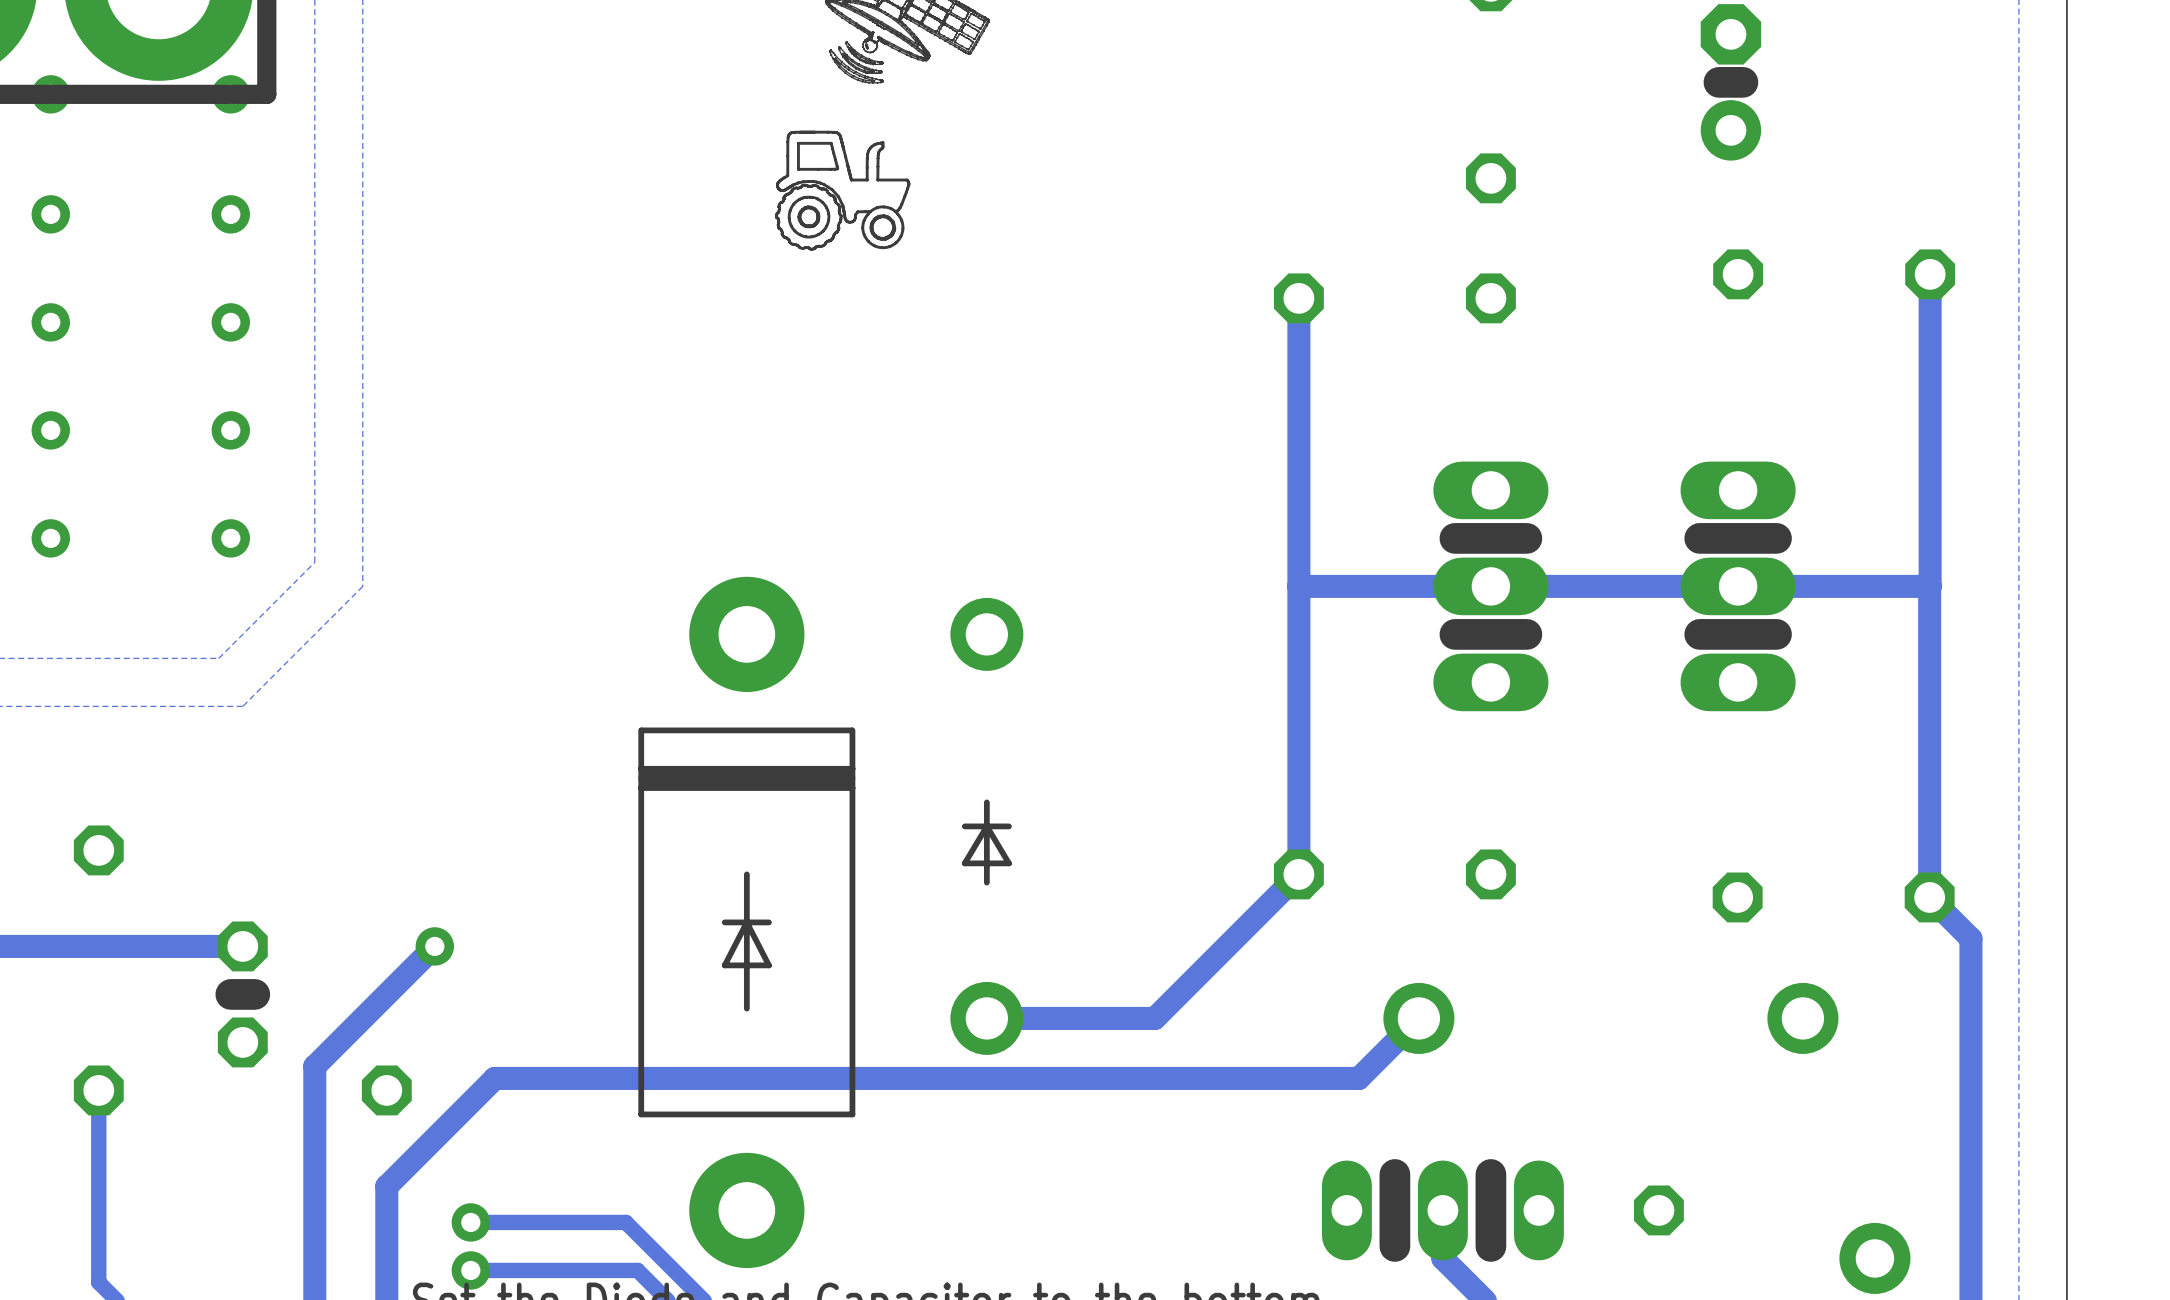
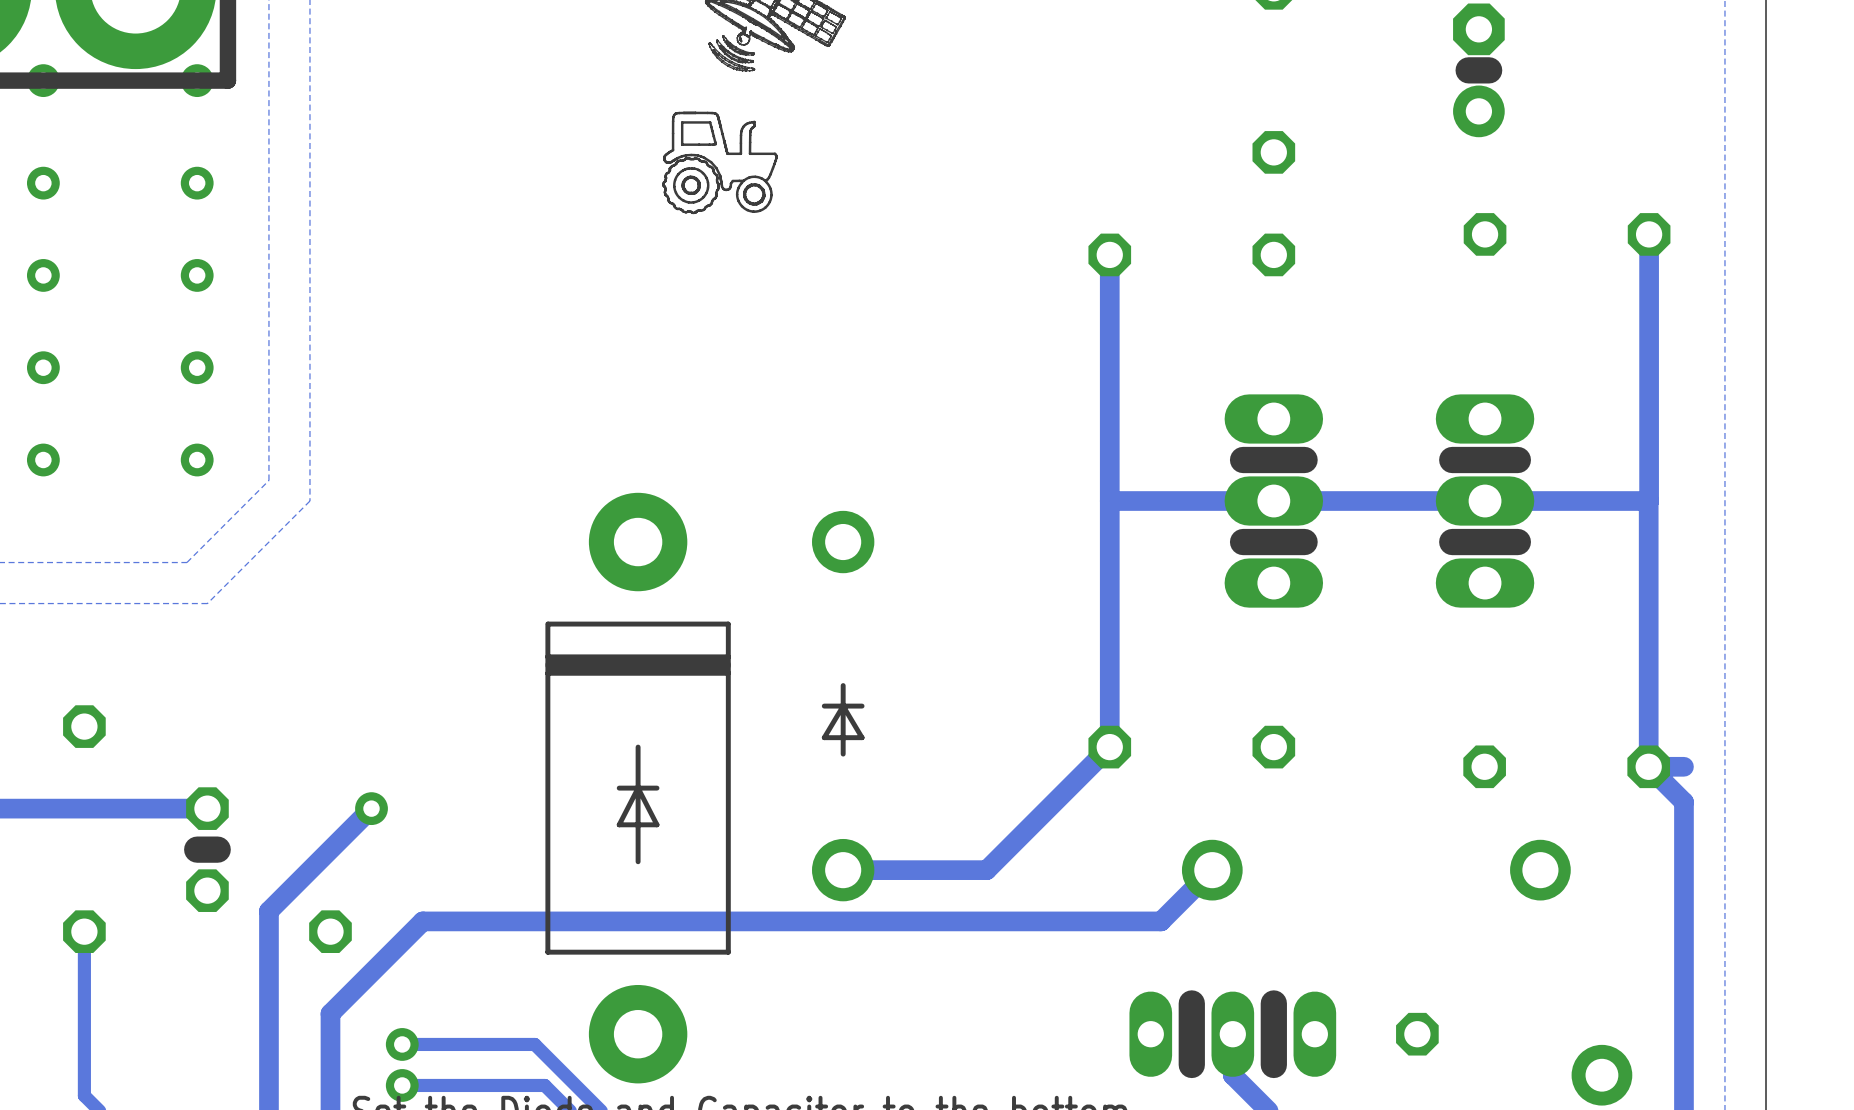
track: none -> (1683, 766) (1648, 766)

